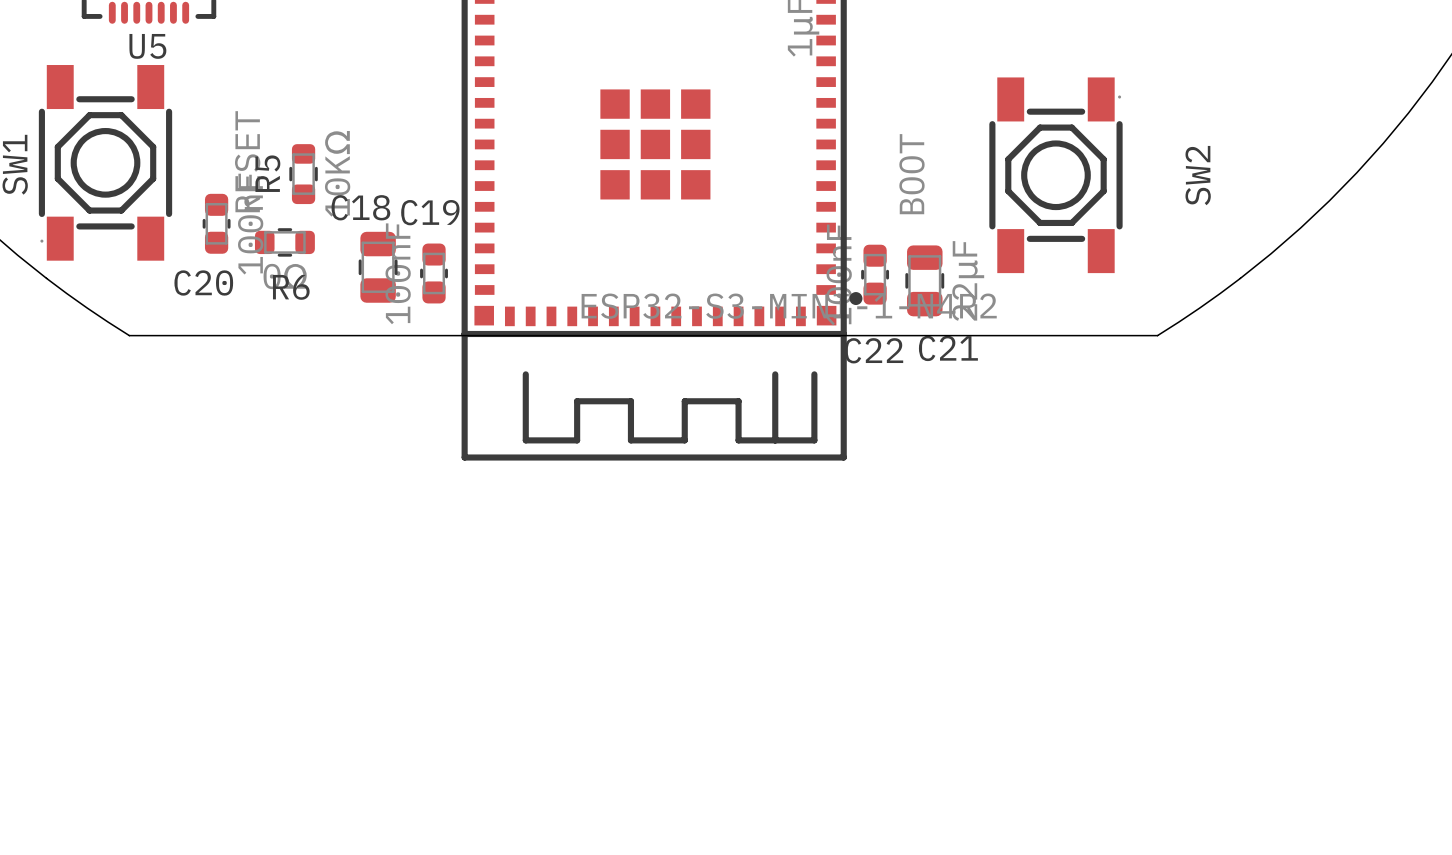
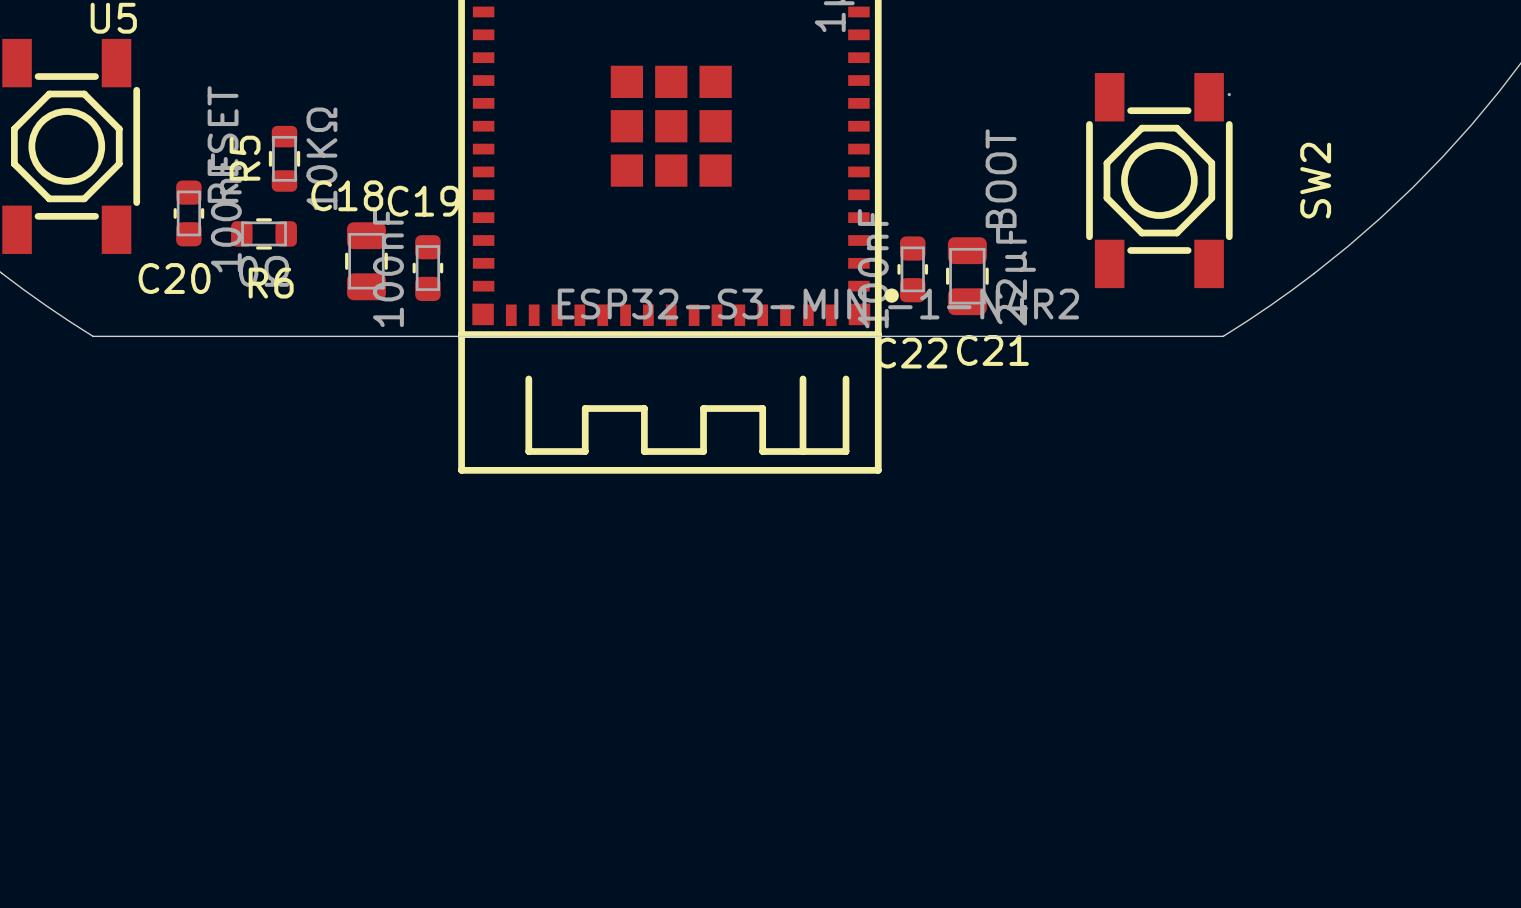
SW2 position: (1055, 175) -> (1159, 180)

